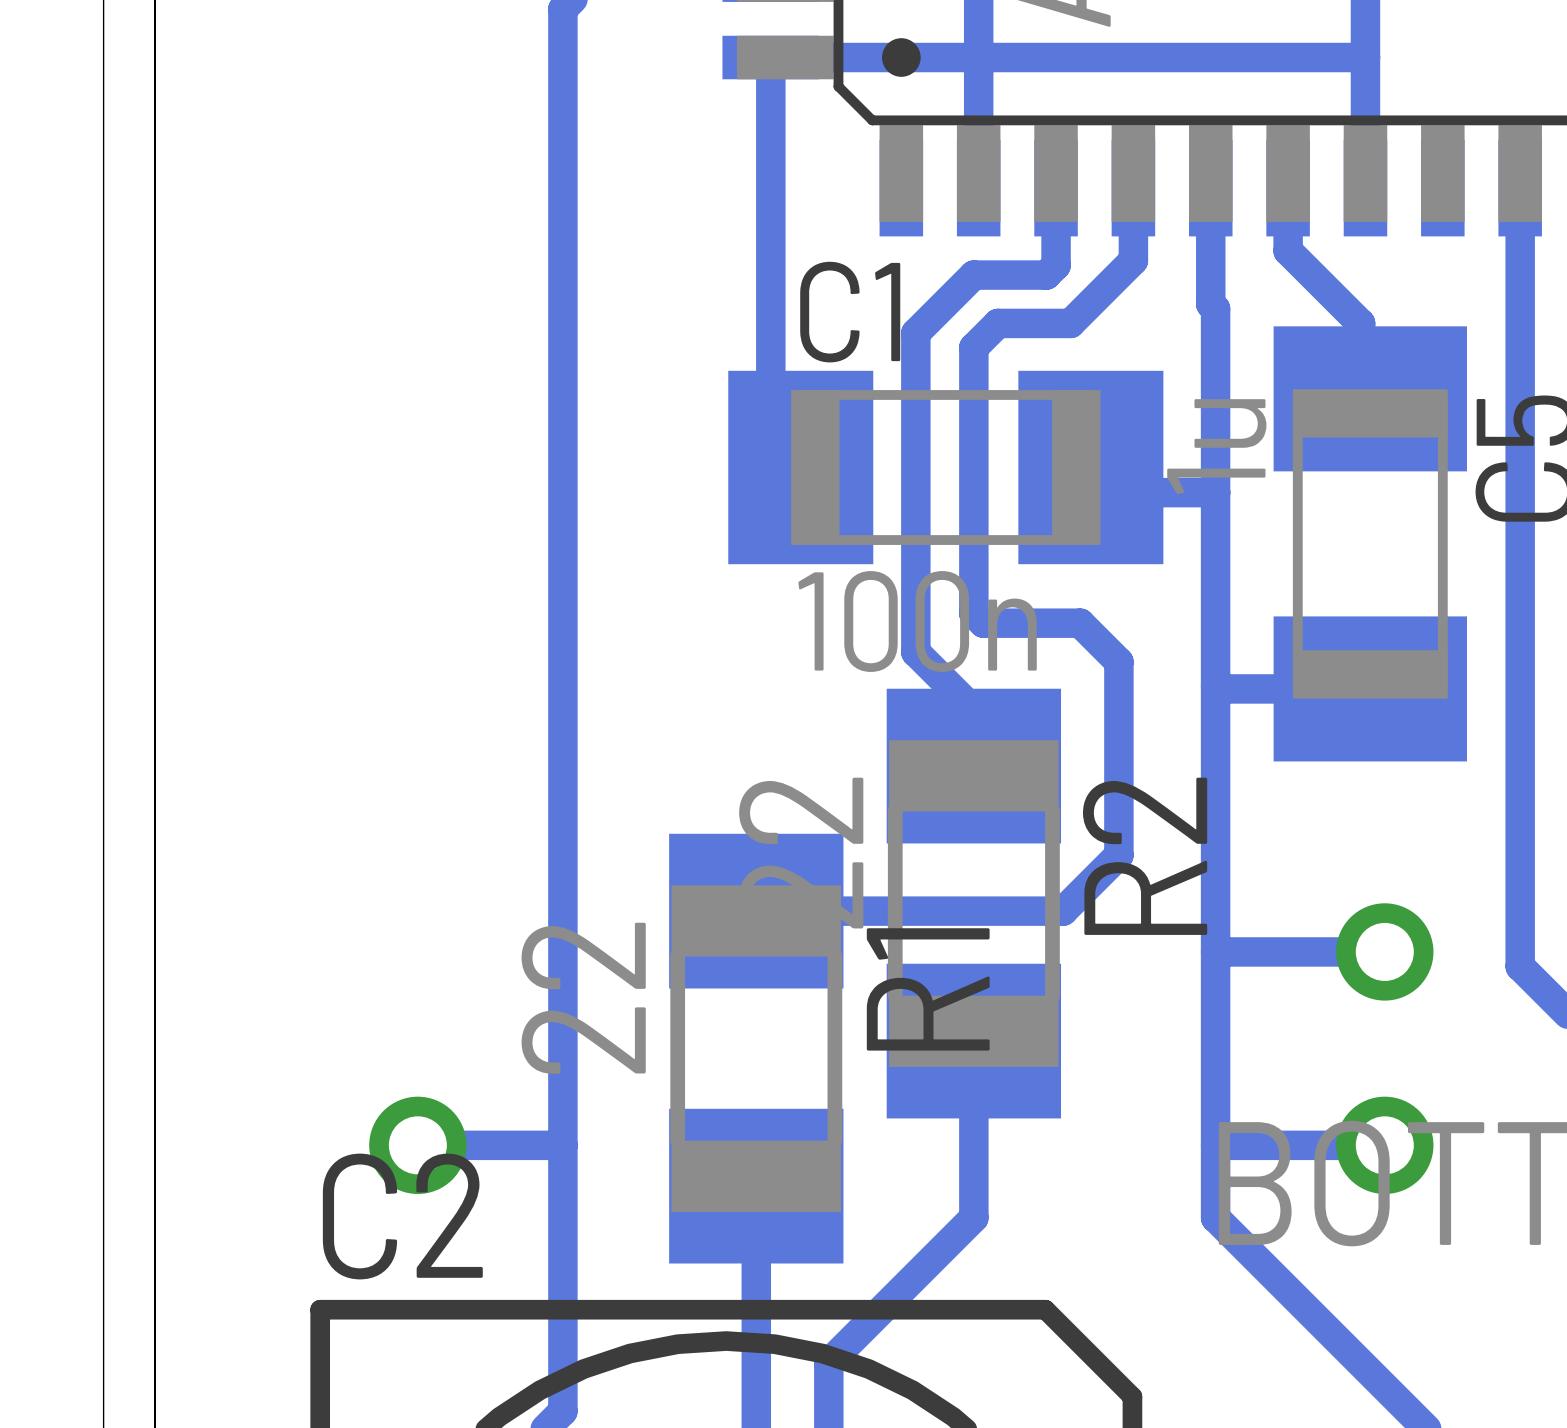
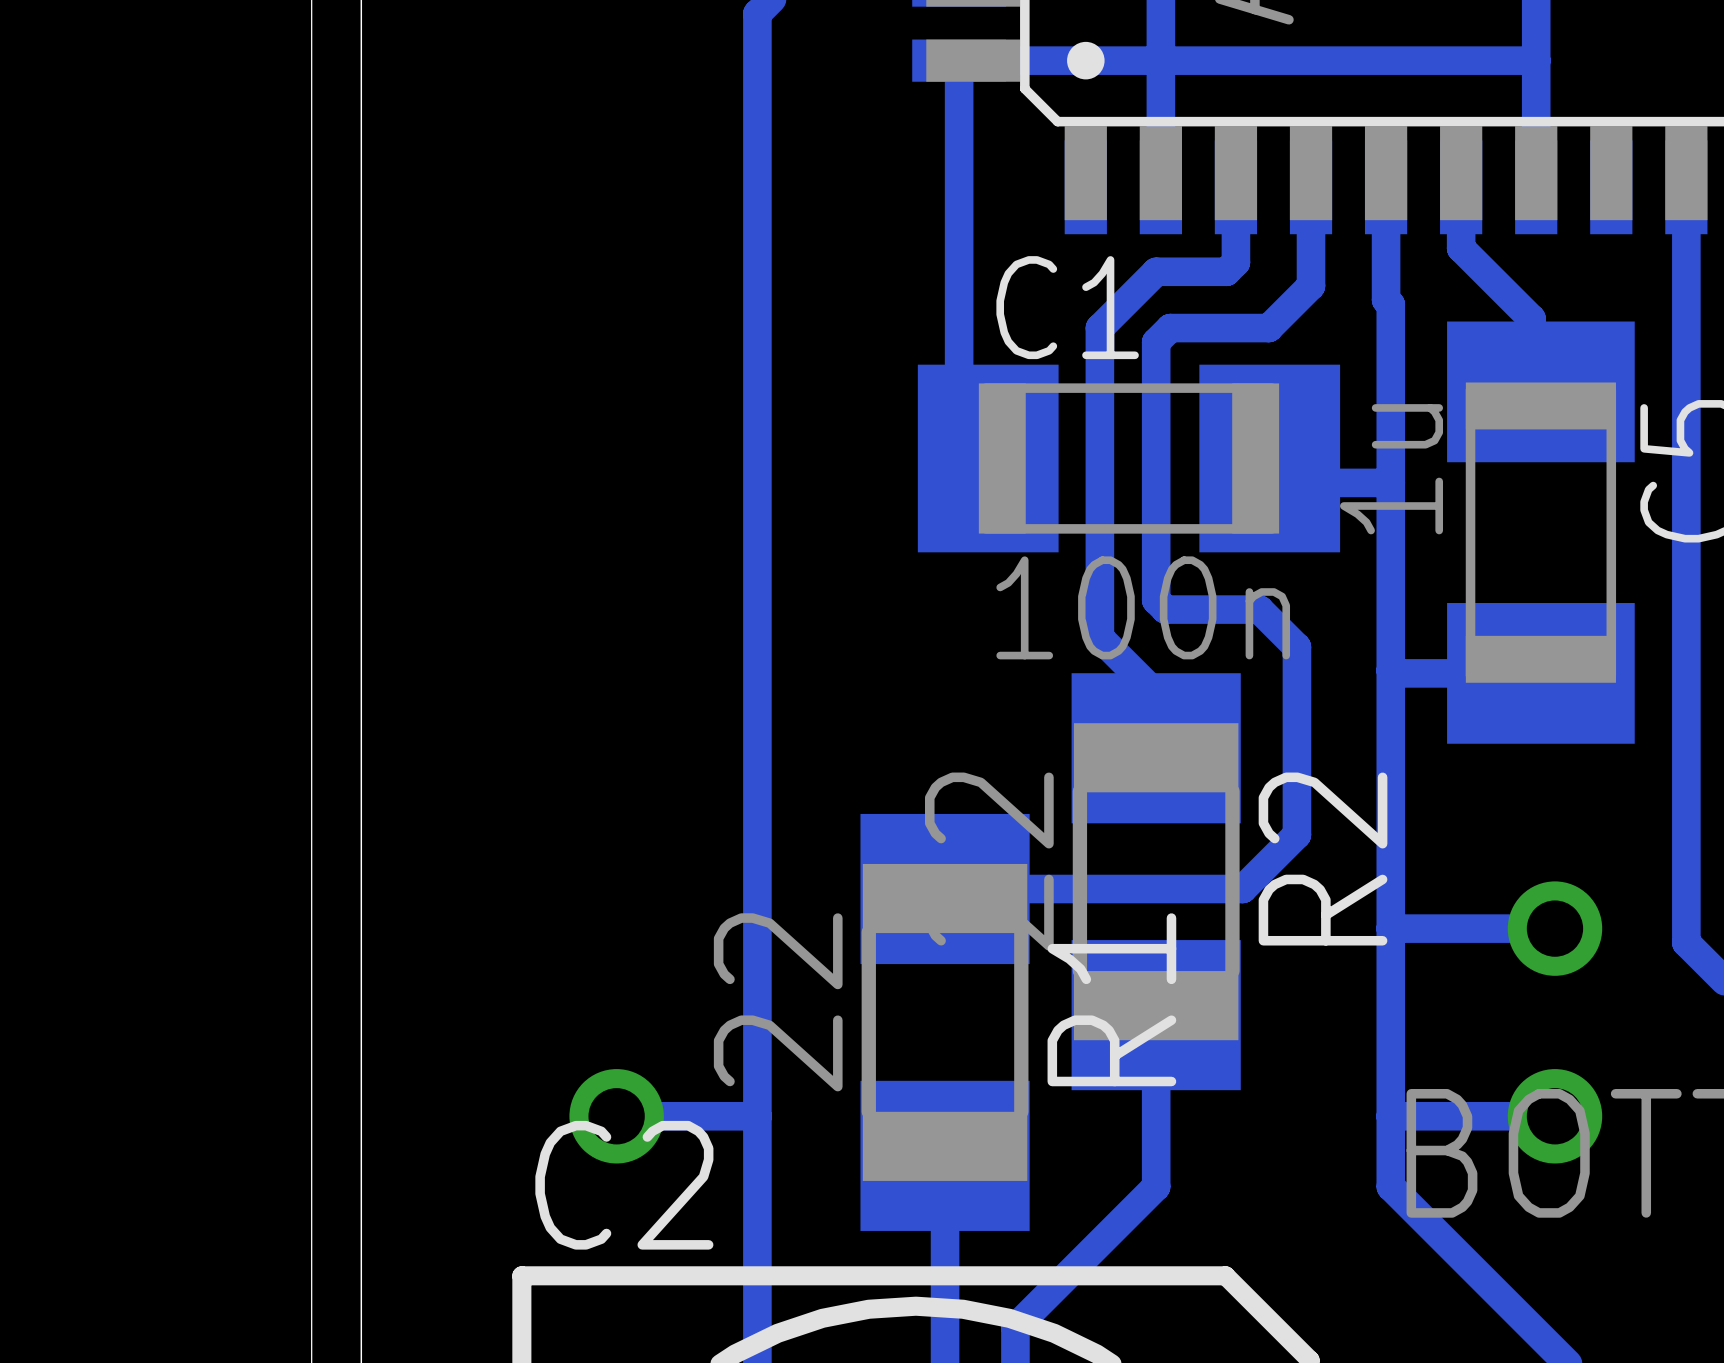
track: (1133, 260) (1070, 323) (998, 323) (988, 333) -> (1311, 257) (1311, 285) (1268, 328) (1170, 328)

